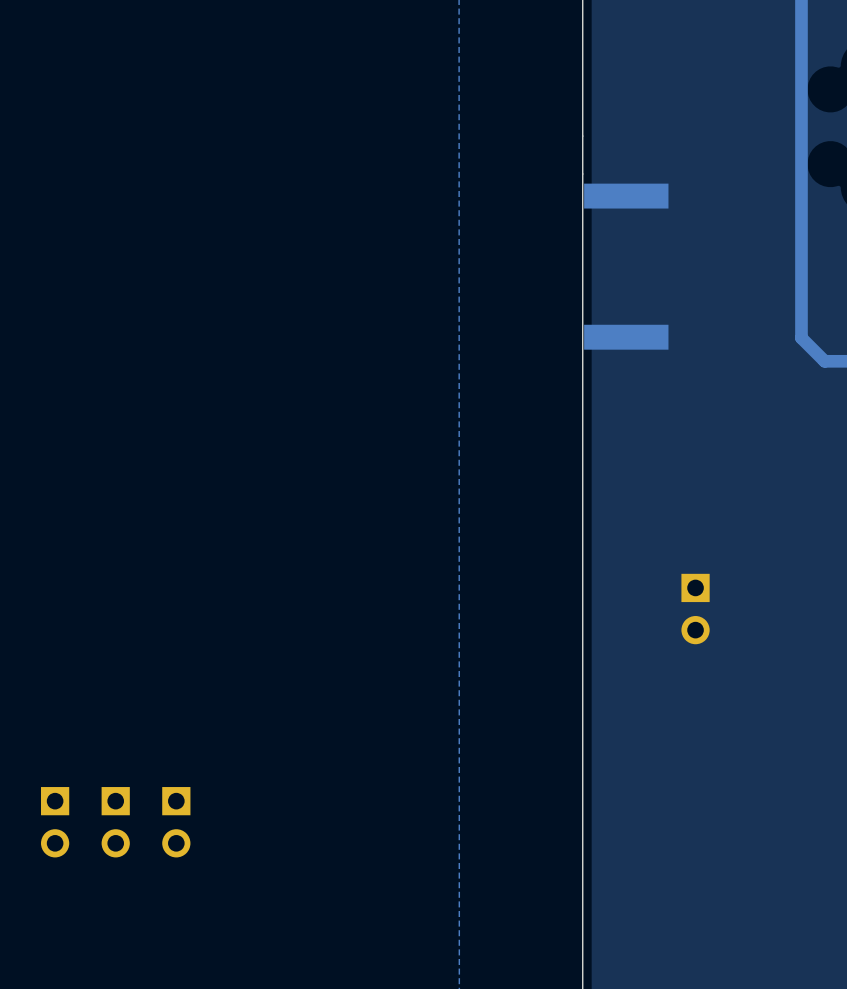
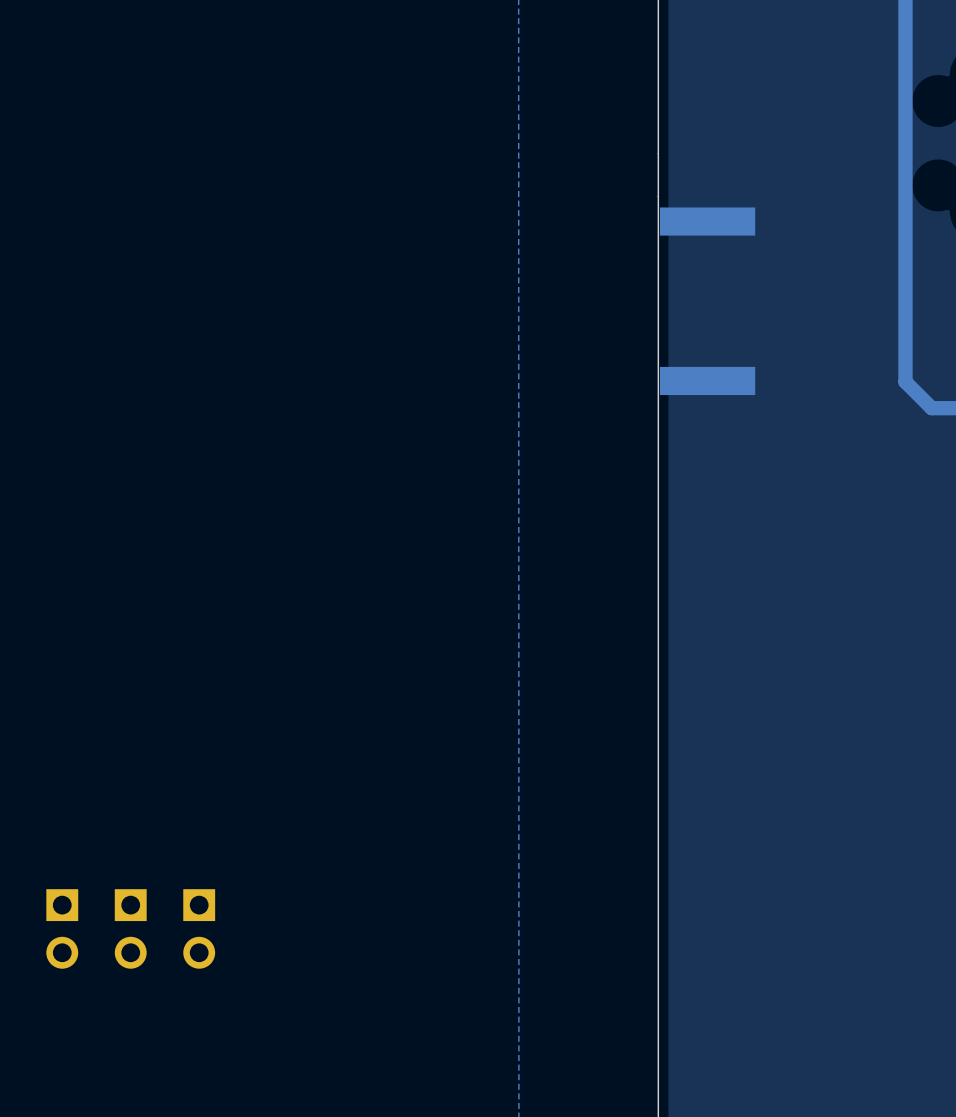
part: (695, 609) -> none

